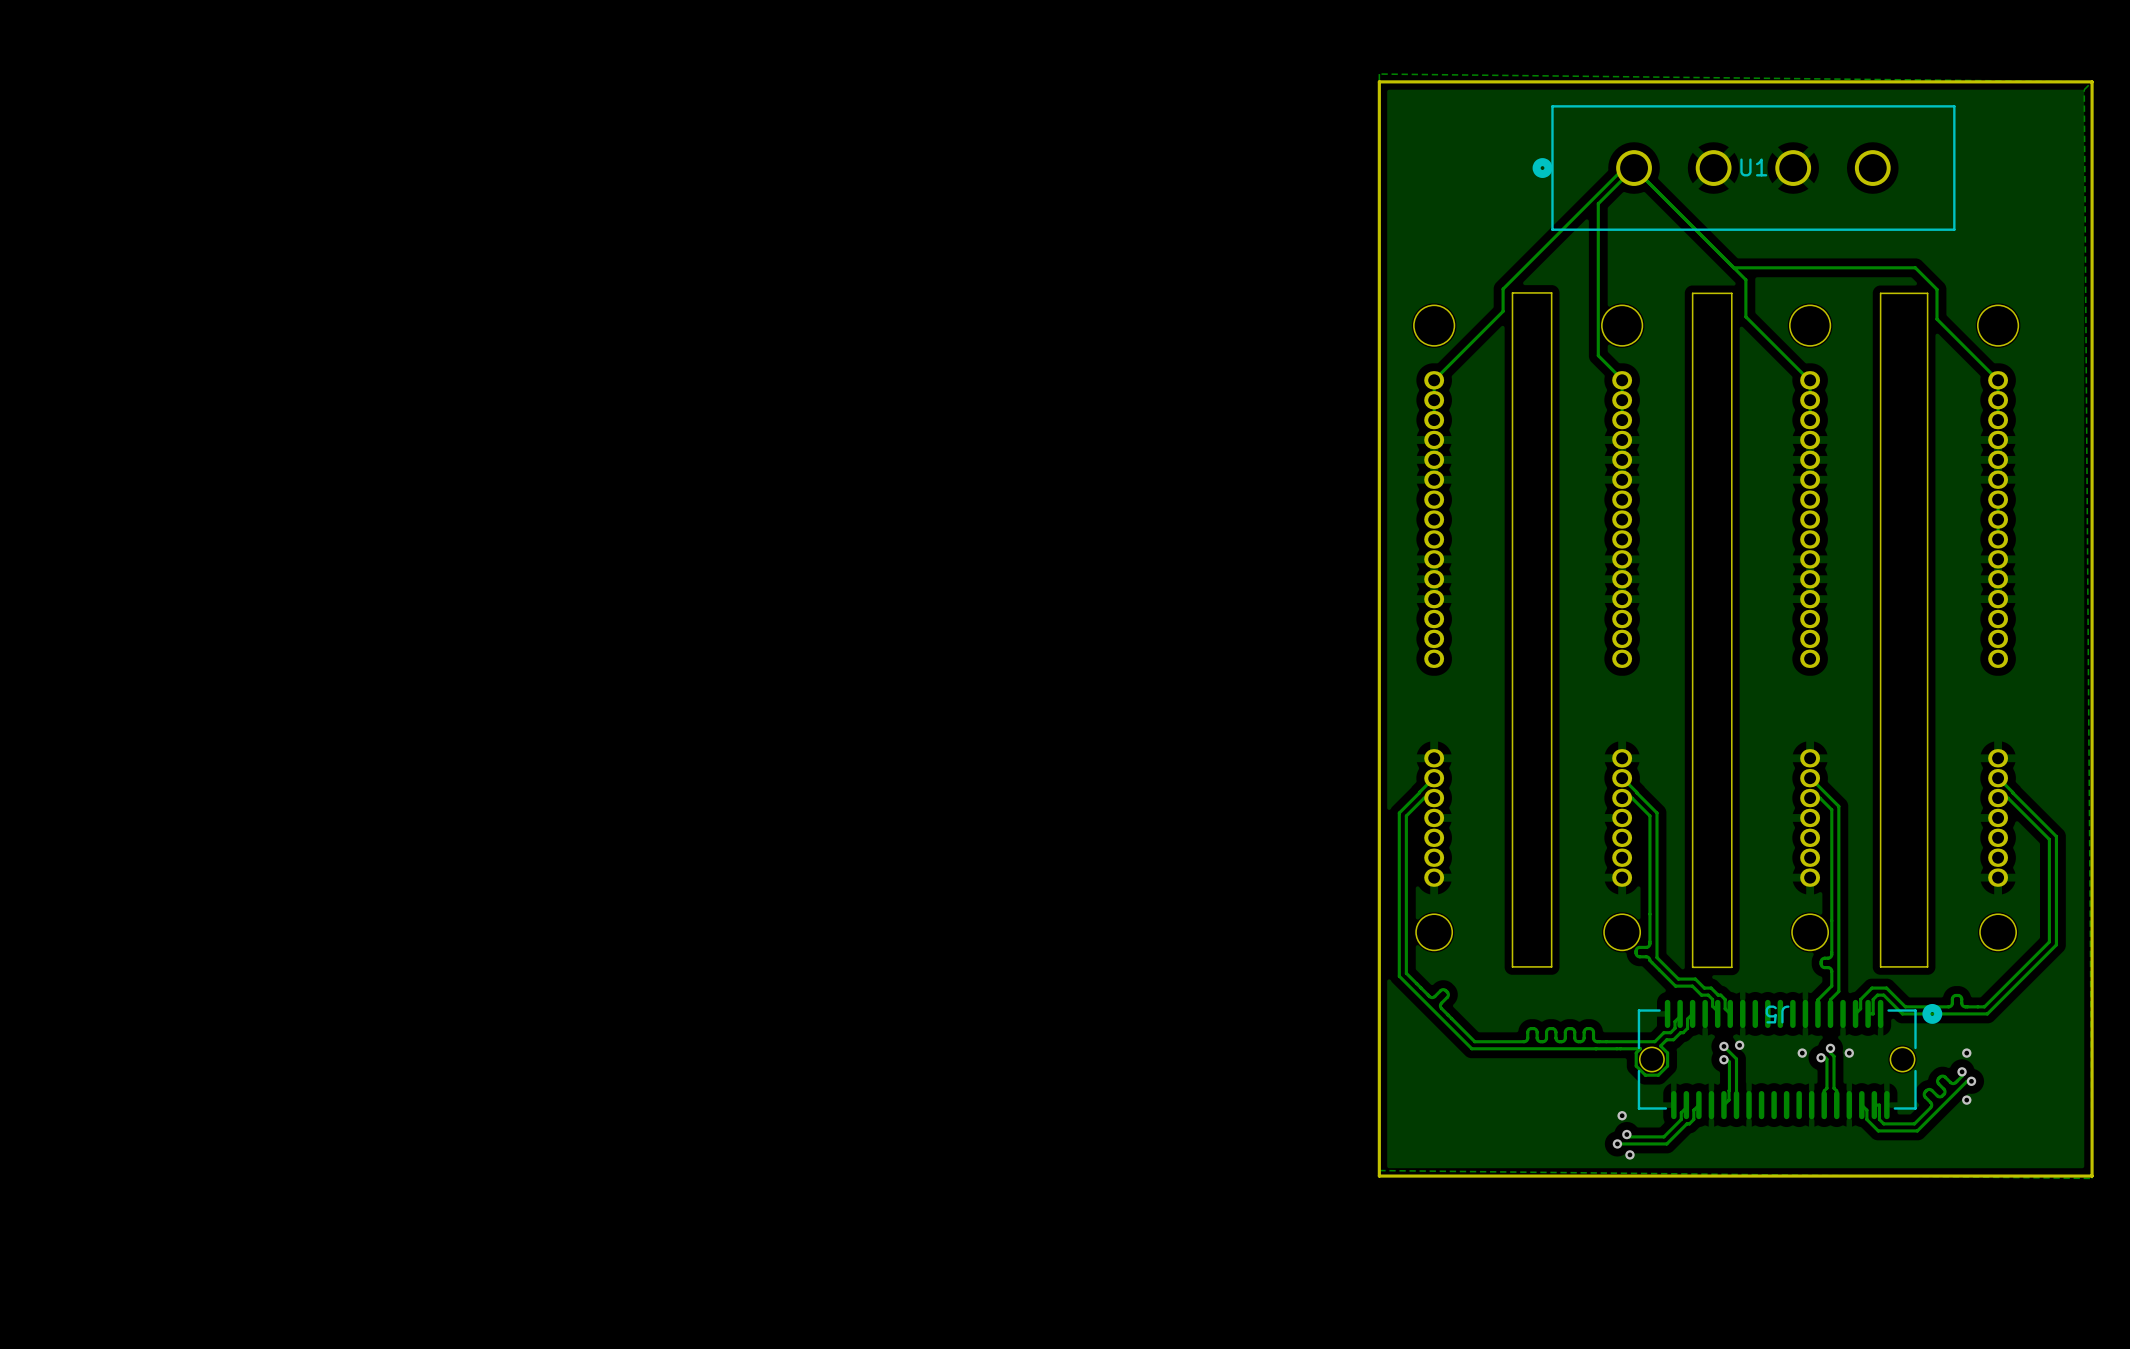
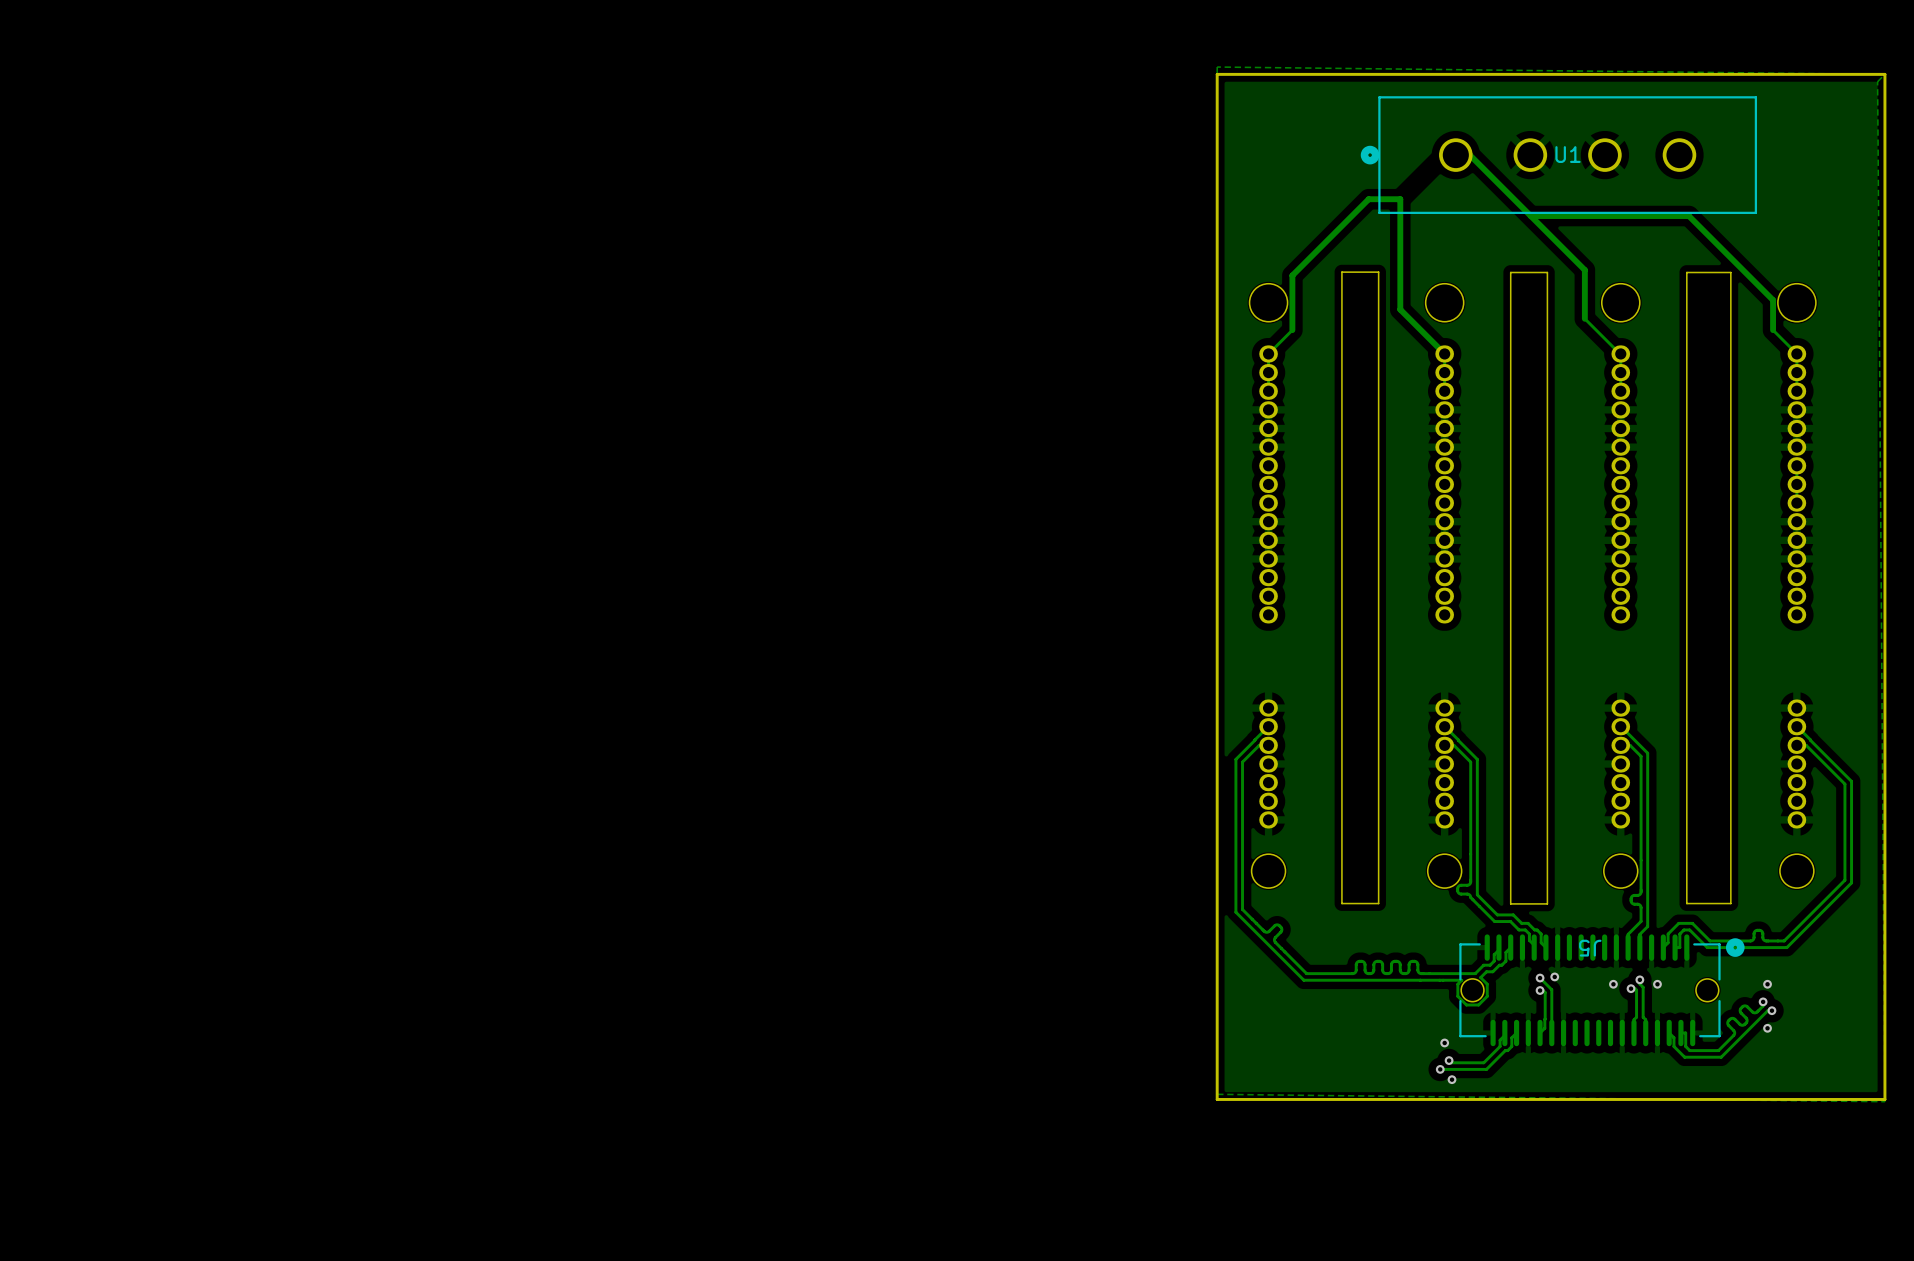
track: (1624, 168) (1503, 289) (1503, 311) (1459, 354) -> (1444, 353) (1400, 309) (1400, 199) (1368, 199) (1292, 275) (1292, 330)
track: (1733, 267) (1915, 267) (1937, 289) (1937, 319) (1972, 354) -> (1530, 216) (1688, 216) (1773, 300) (1773, 330)
track: (1771, 342) (1745, 316) (1745, 279) (1634, 168) (1598, 203) (1598, 355) (1622, 380) -> (1584, 318) (1584, 270) (1469, 155) (1455, 155)

